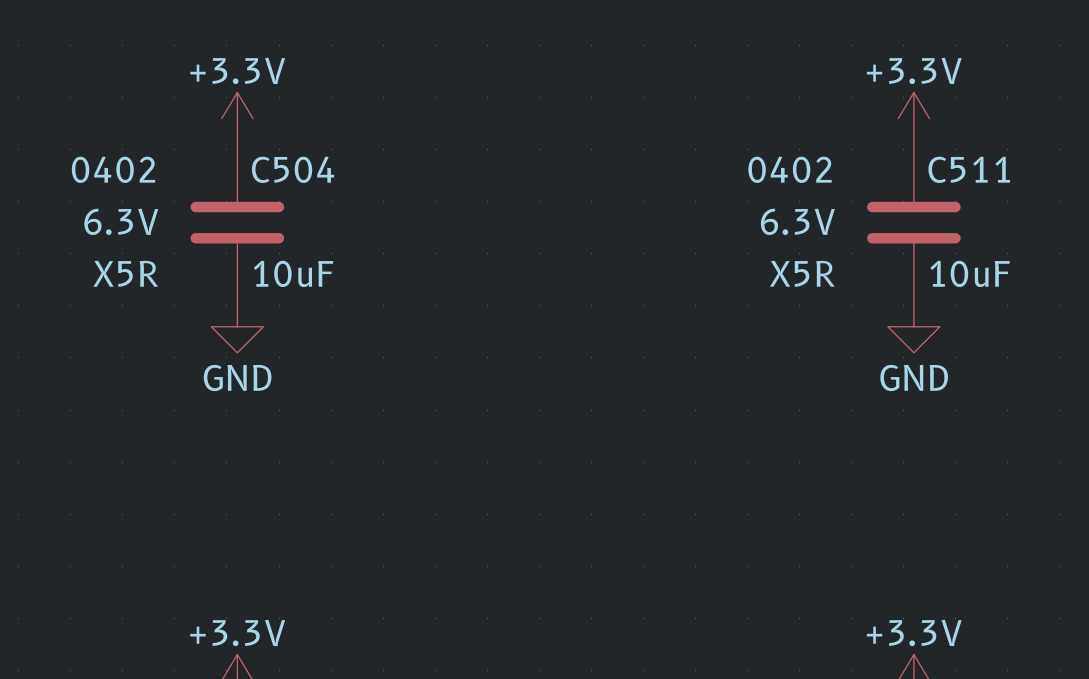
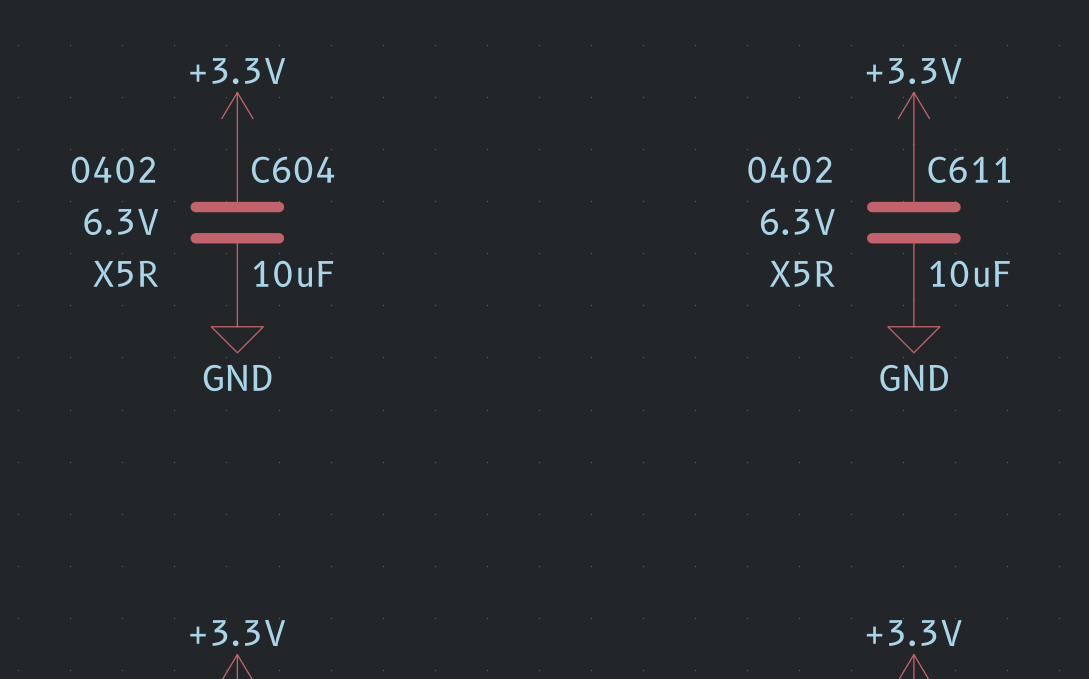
C504 name: C504 (293, 169) -> C604 (293, 169)
C511 name: C511 (969, 169) -> C611 (969, 169)

